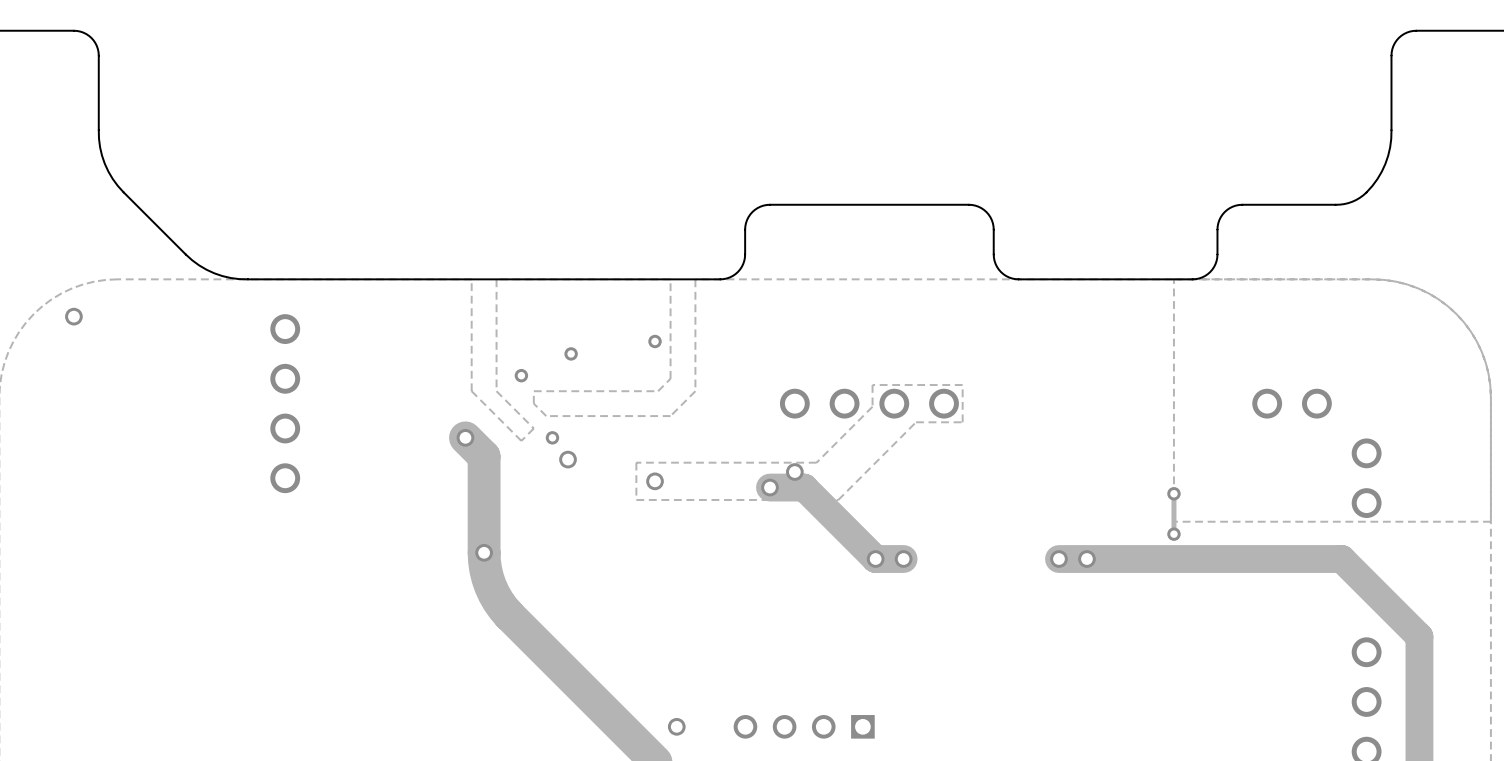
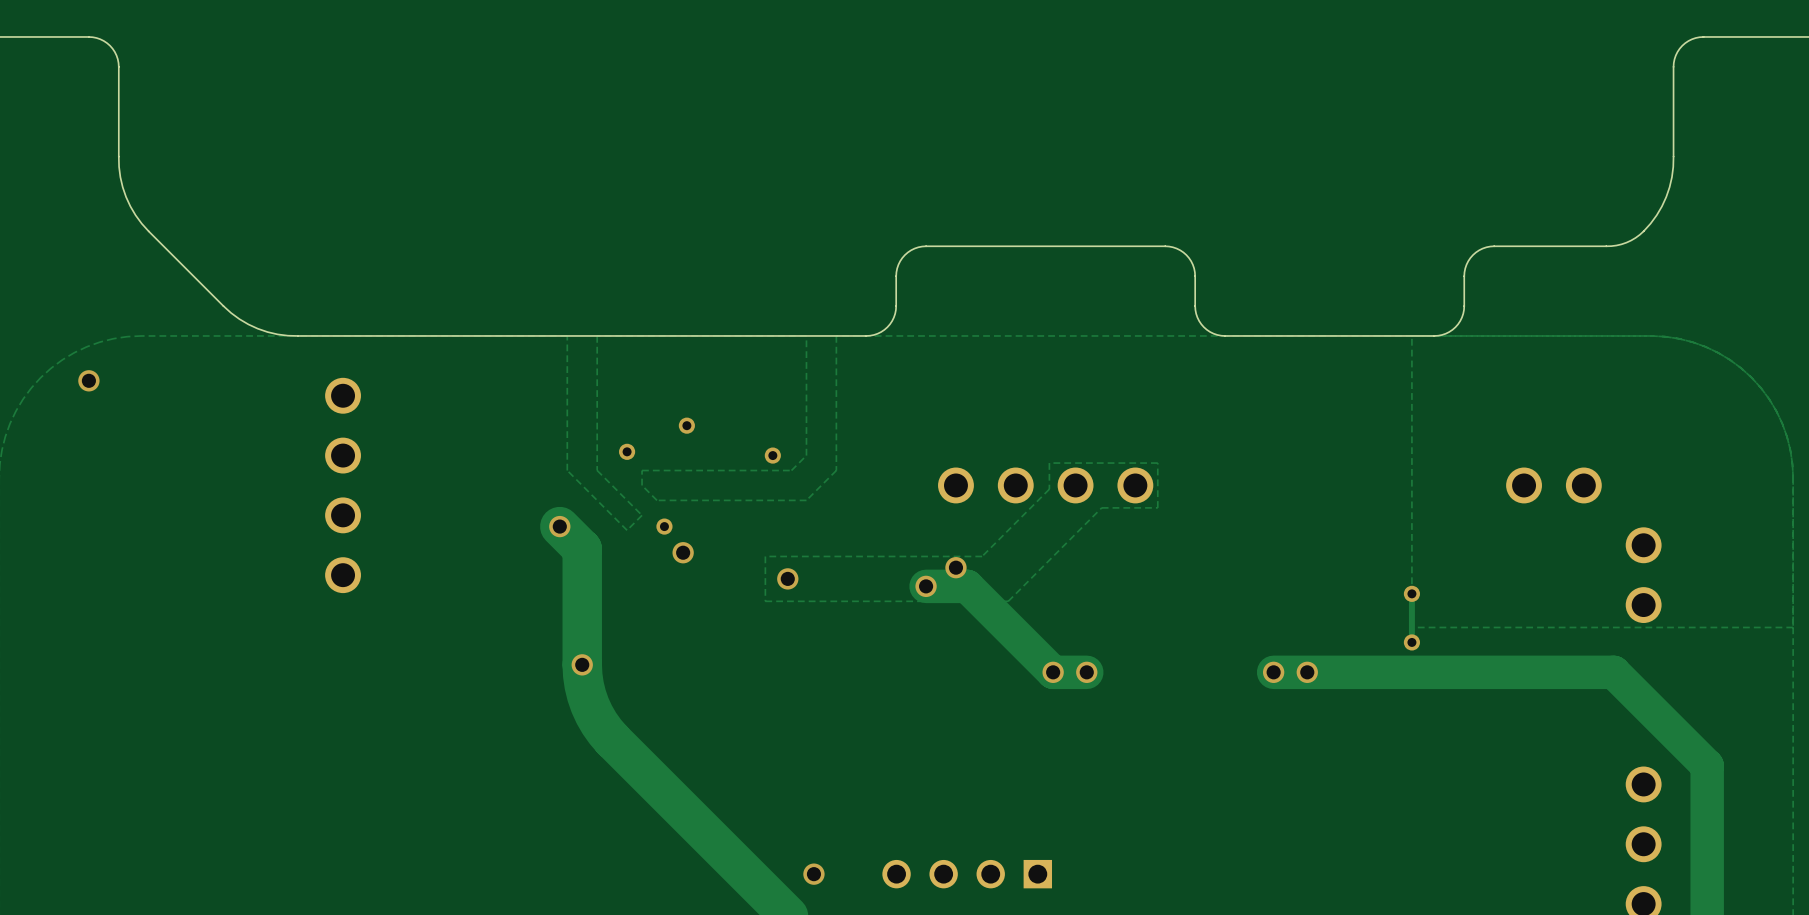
via position: (655, 341) -> (772, 455)

